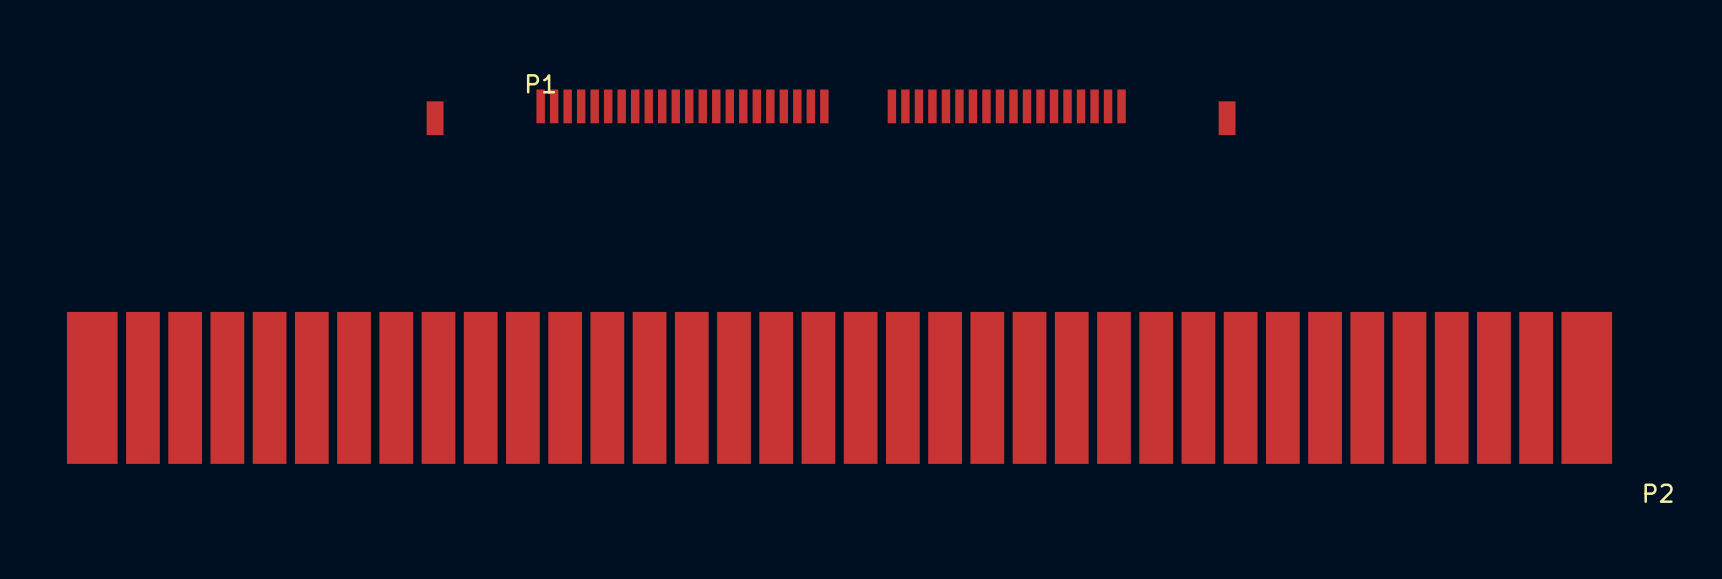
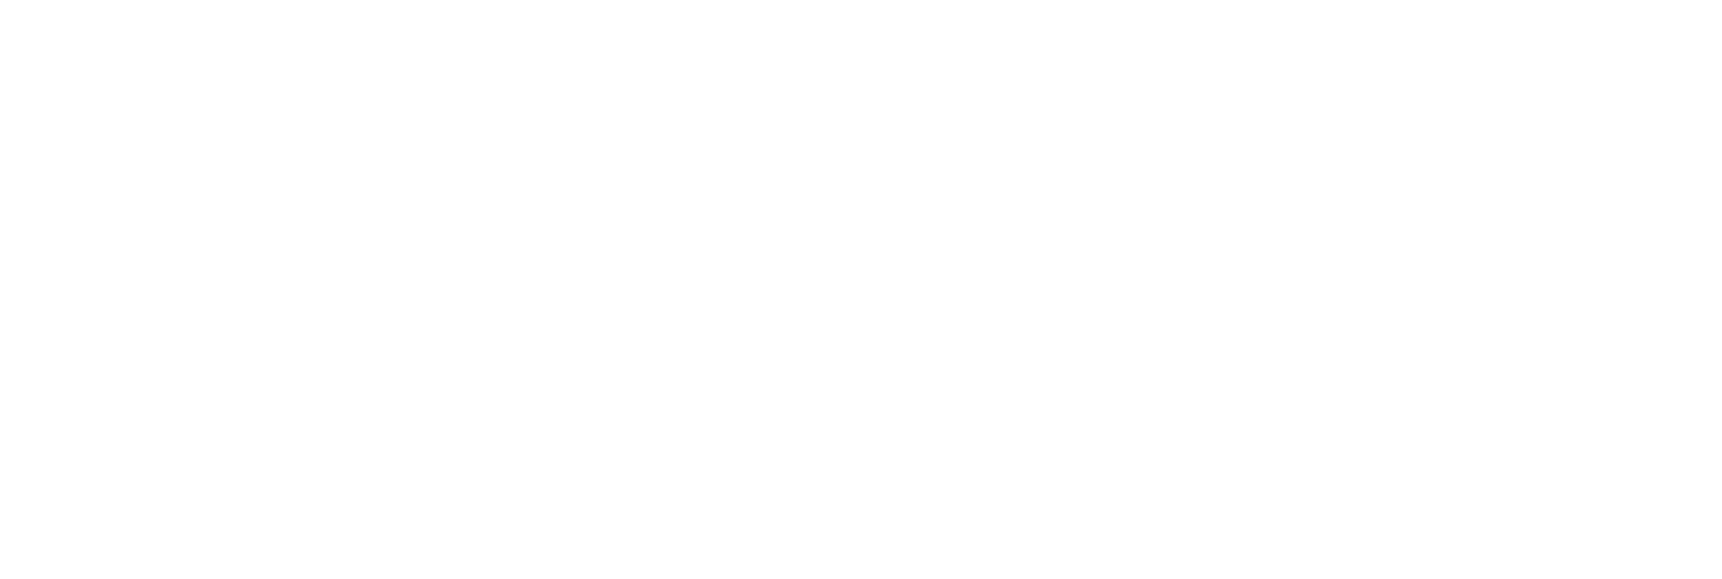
P1: (831, 112) -> none
P2: (839, 387) -> none

